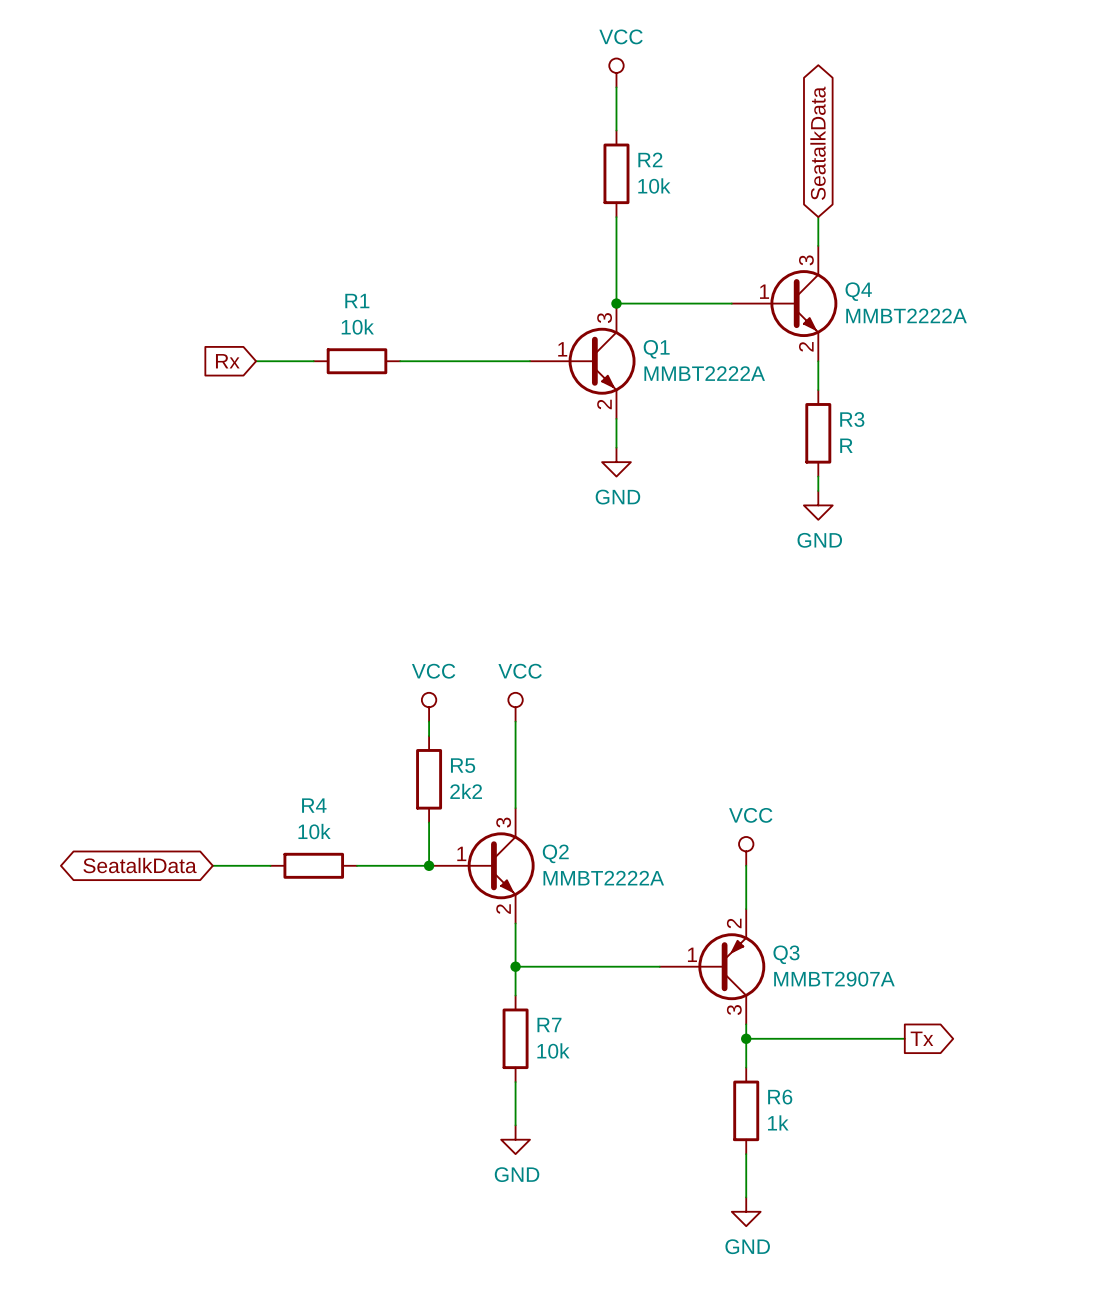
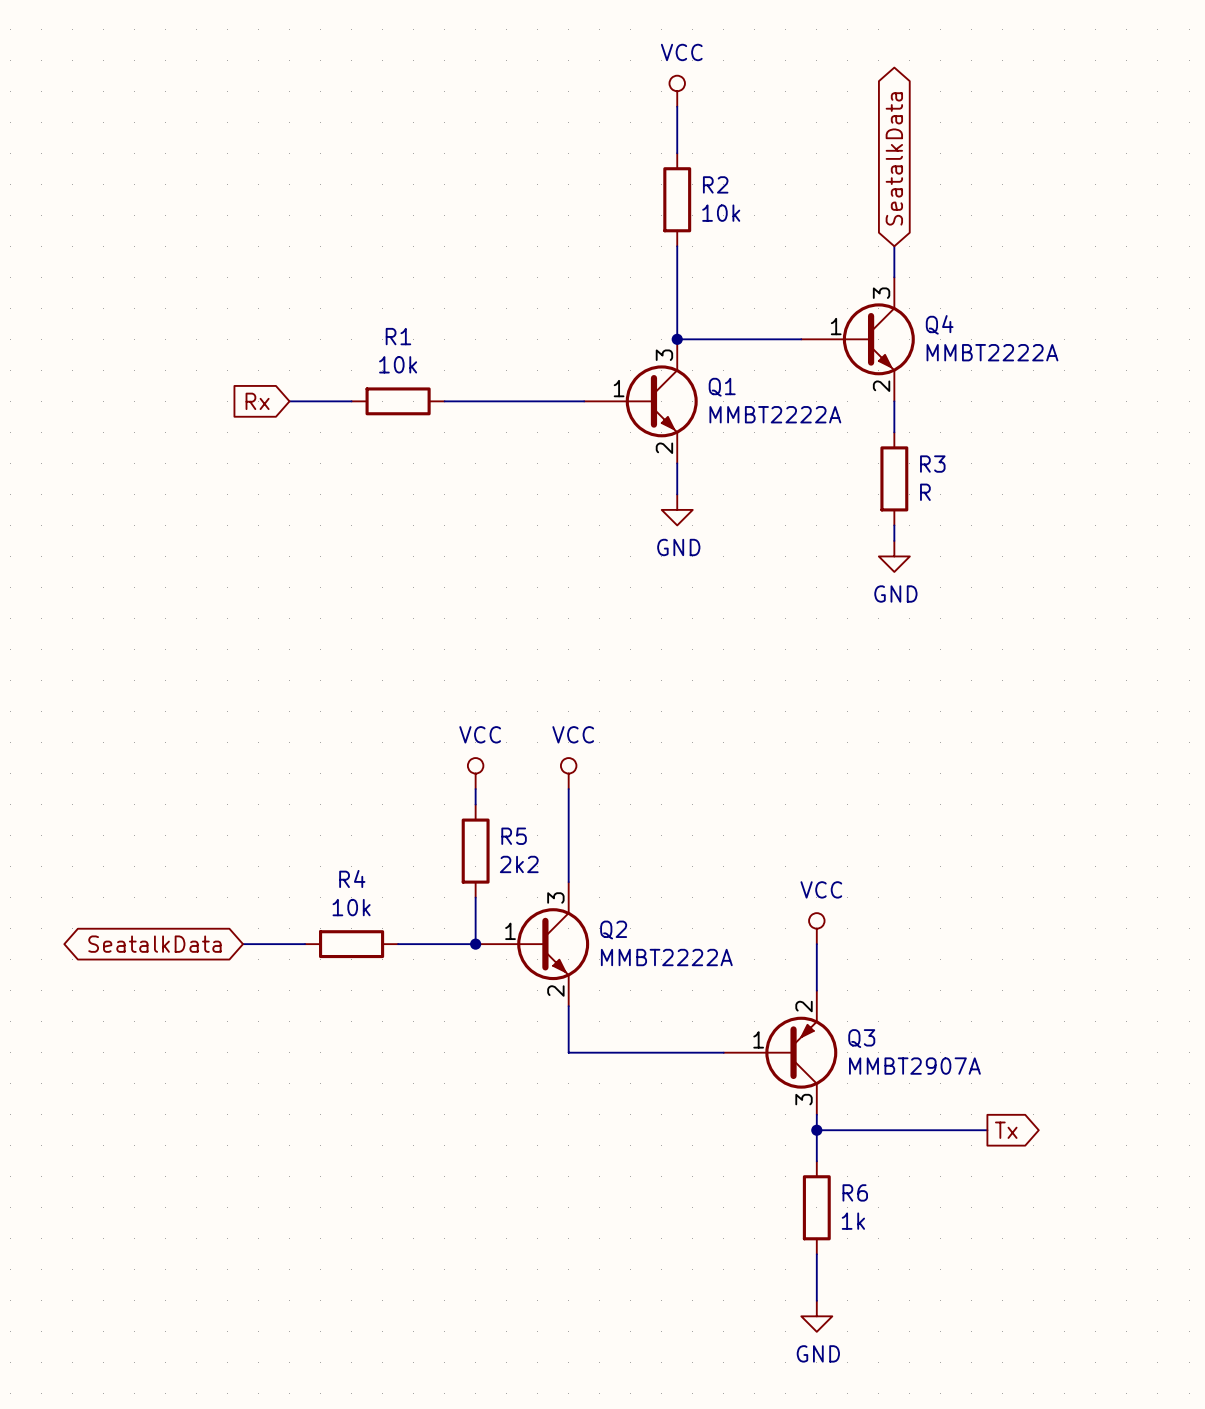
wire: (515, 966) (515, 995) -> none
junction: (515, 966) -> none
R7: 10k (515, 1038) -> none
wire: (515, 1082) (515, 1125) -> none
power symbol: GND (515, 1139) -> none

